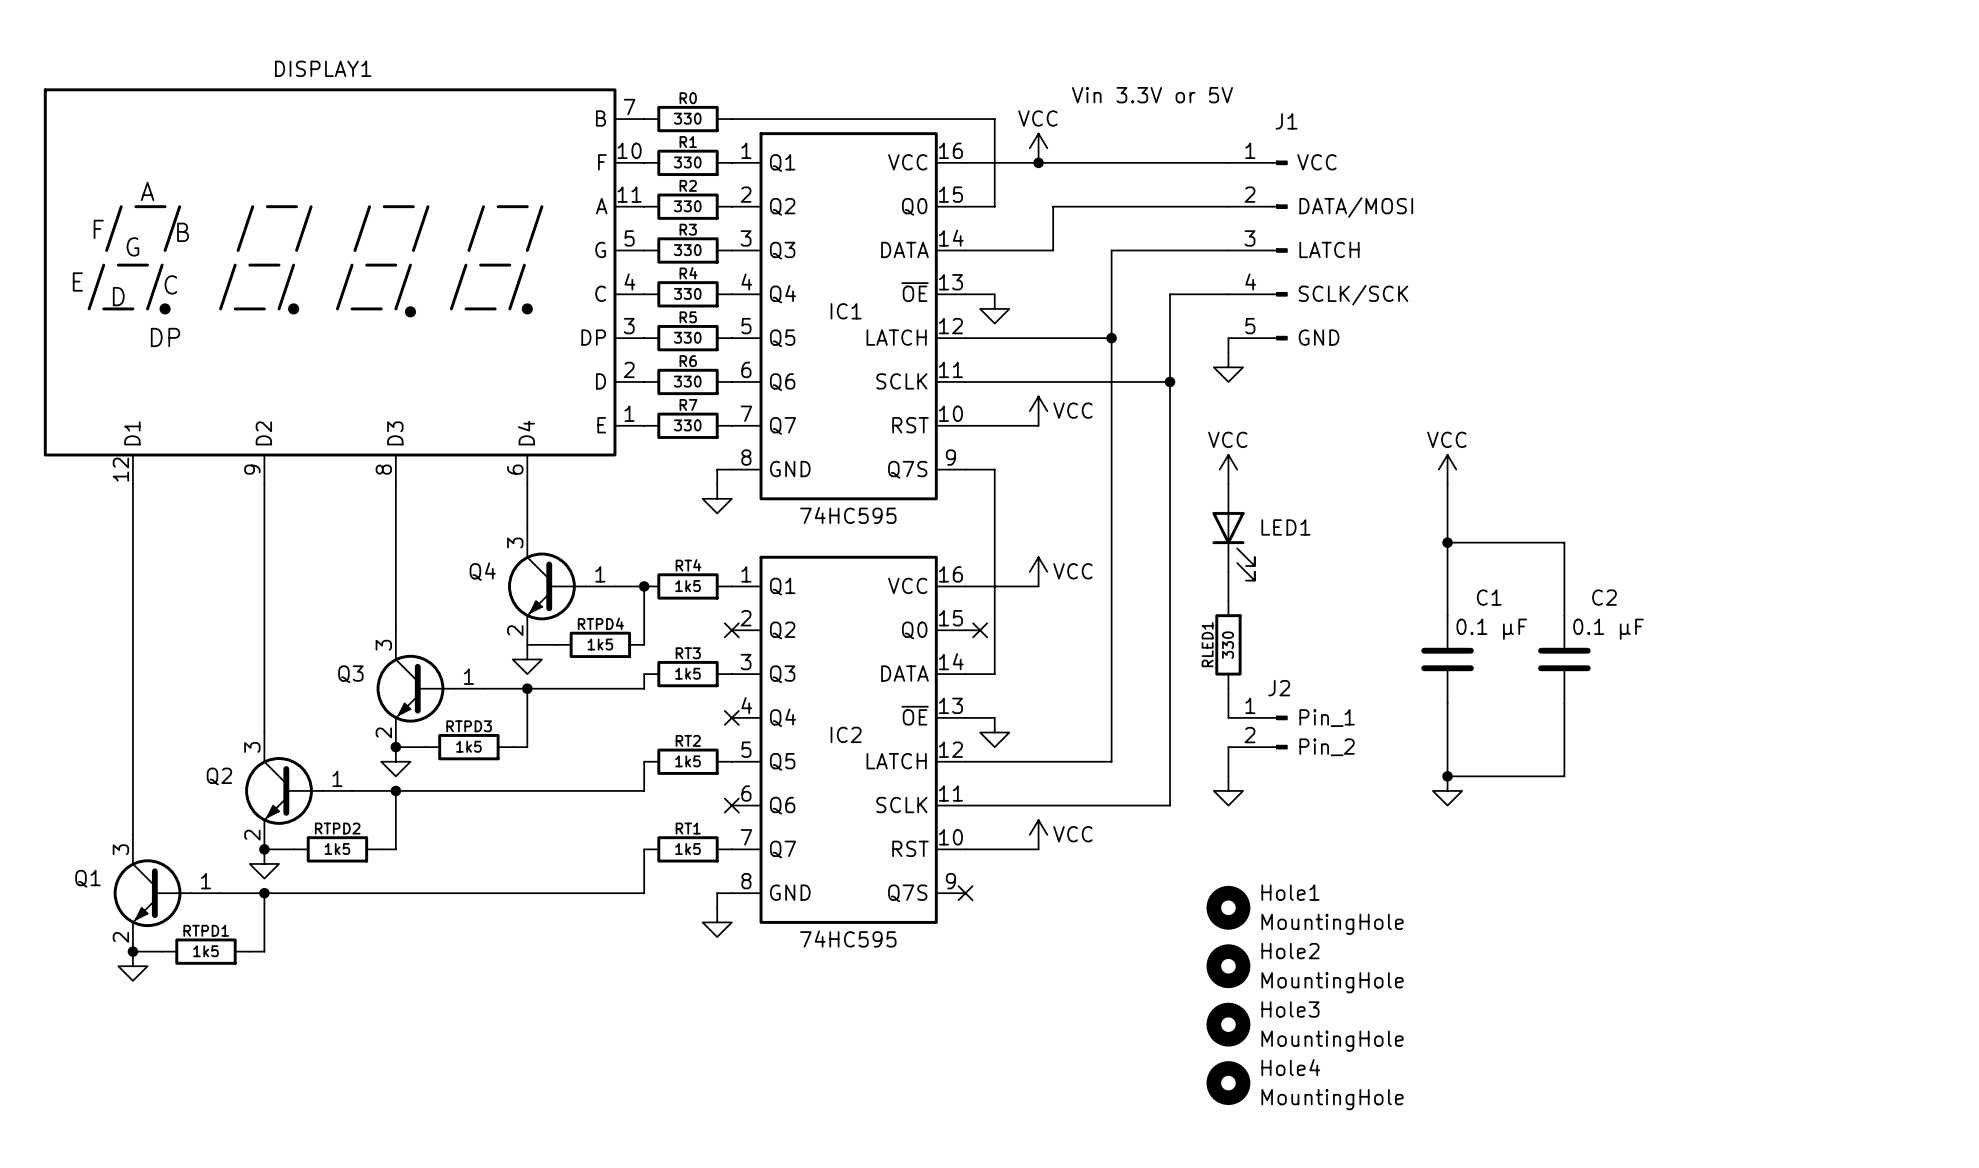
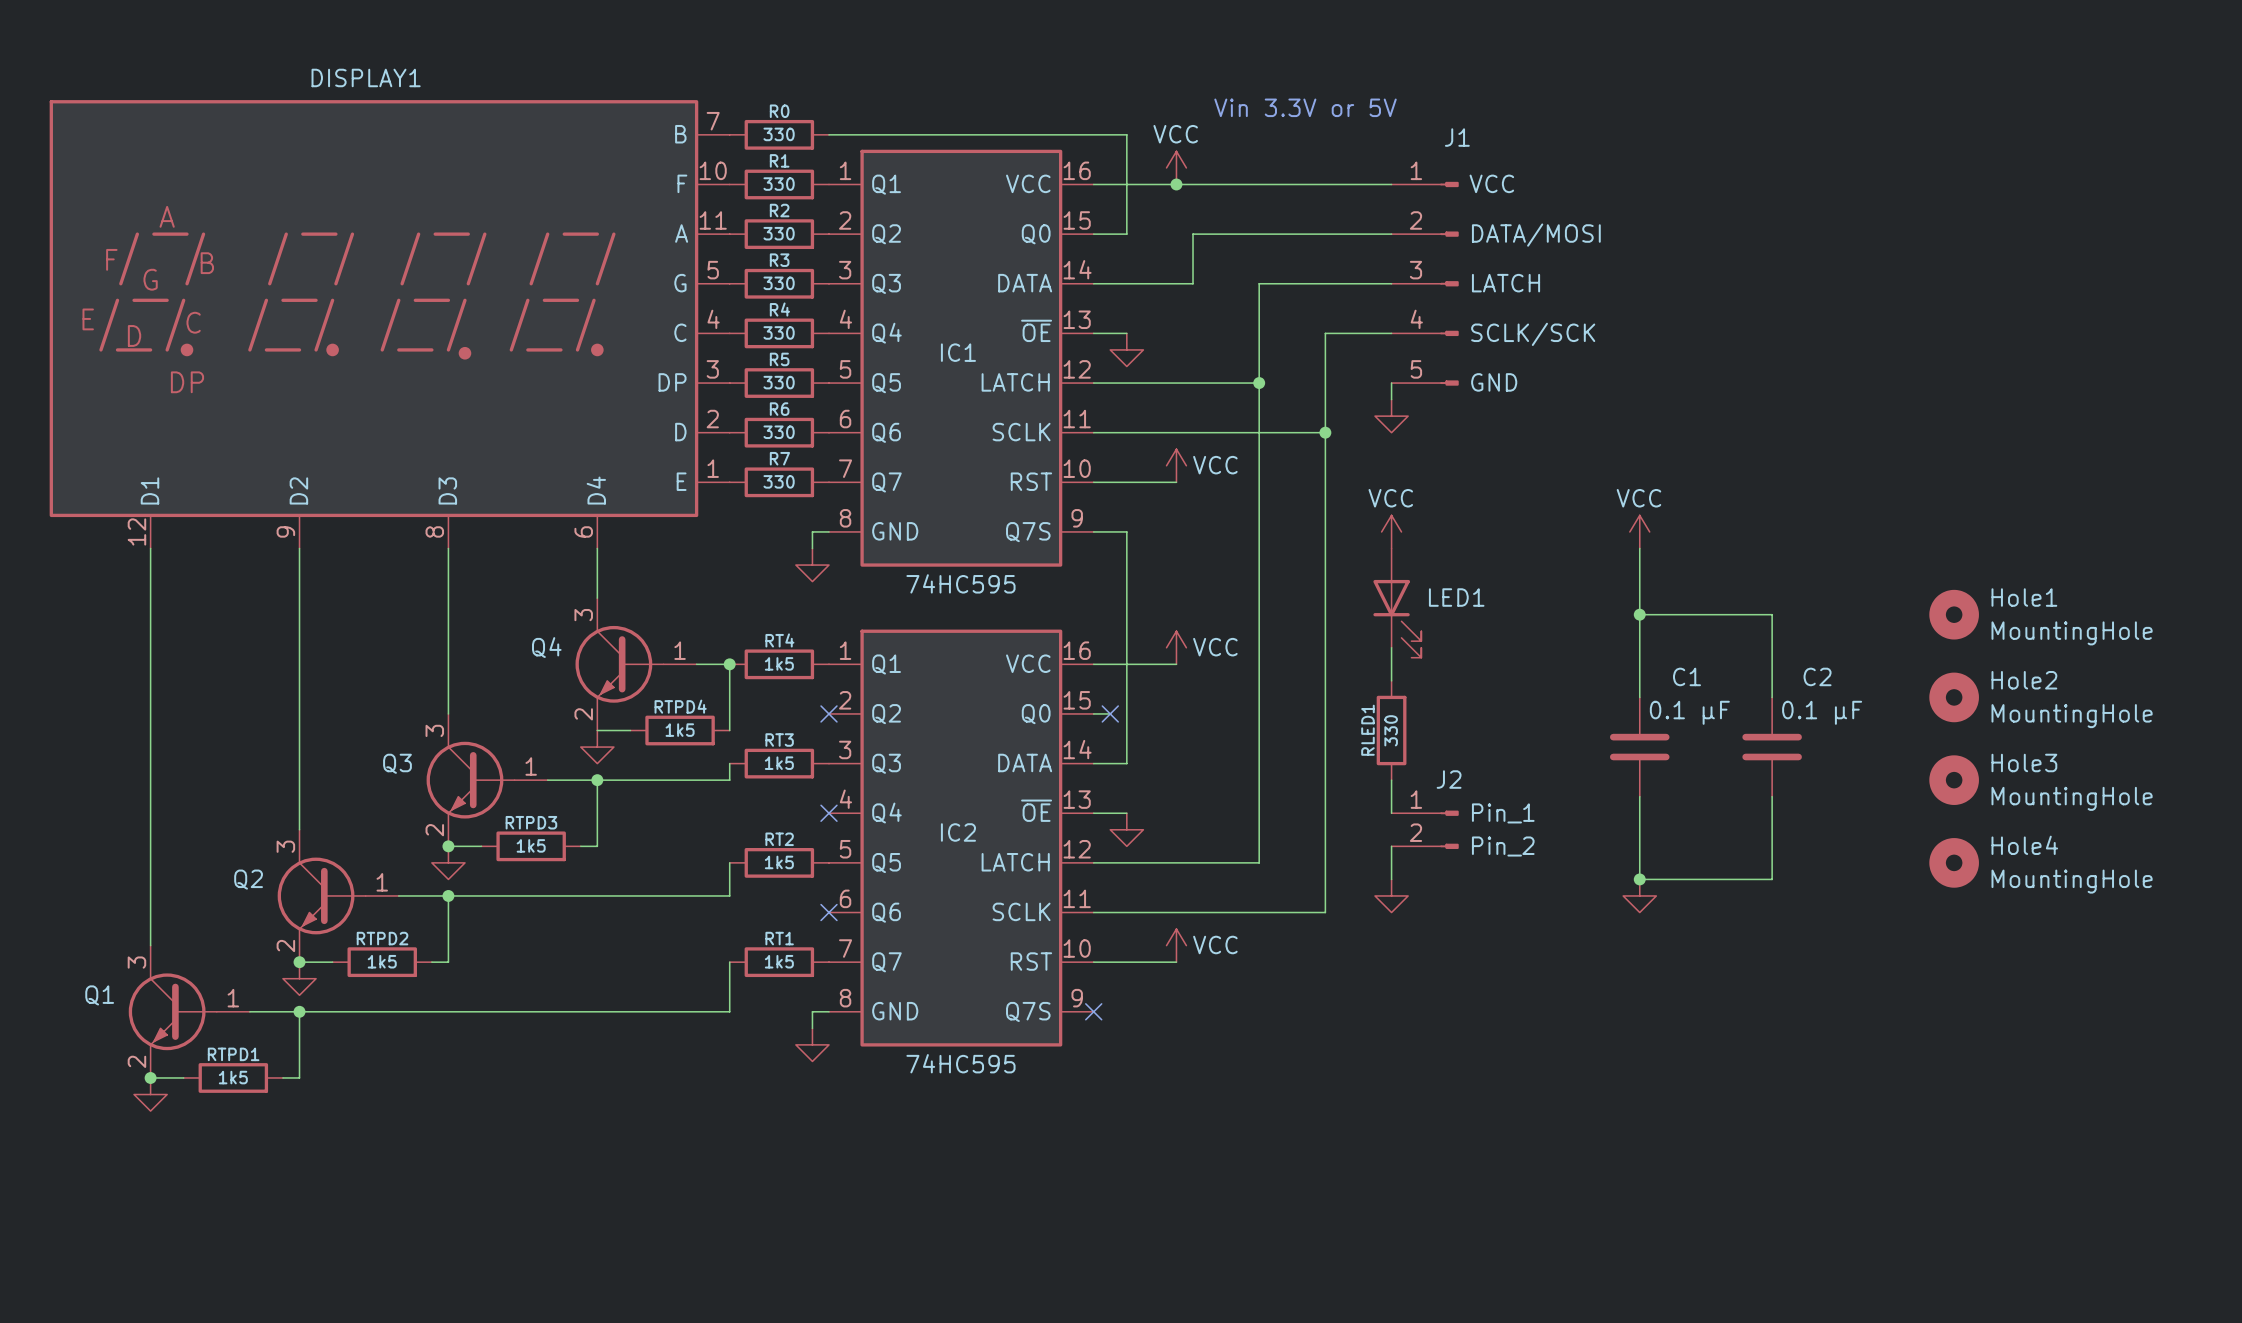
Hole1 position: (1228, 907) -> (1954, 614)
Hole2 position: (1228, 966) -> (1954, 697)
Hole3 position: (1228, 1024) -> (1954, 780)
Hole4 position: (1228, 1083) -> (1954, 862)

